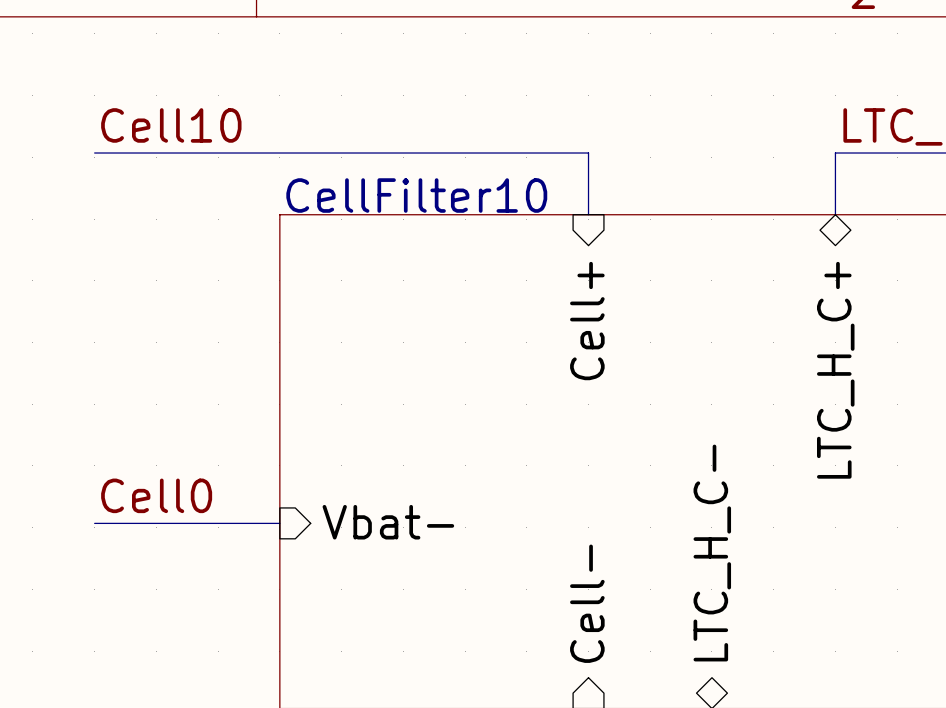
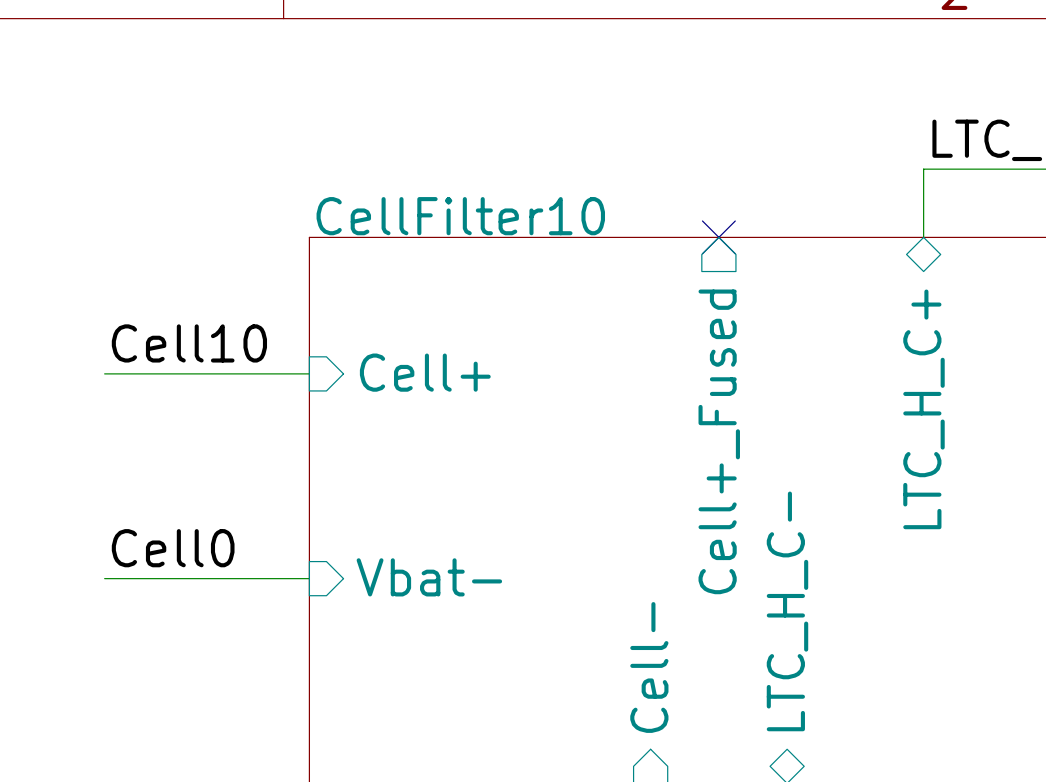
label position: Cell10 (171, 125) -> Cell10 (189, 343)
wire: (94, 153) (588, 153) (588, 214) -> none
no-connect mark: none -> (718, 237)
sheet pin rotation: 0° (587, 321) -> 90° counterclockwise (425, 372)
sheet pin position: Cell+ (587, 321) -> Cell+ (425, 372)
wire: none -> (104, 373) (309, 373)
sheet pin: none -> Cell+_Fused (719, 441)

